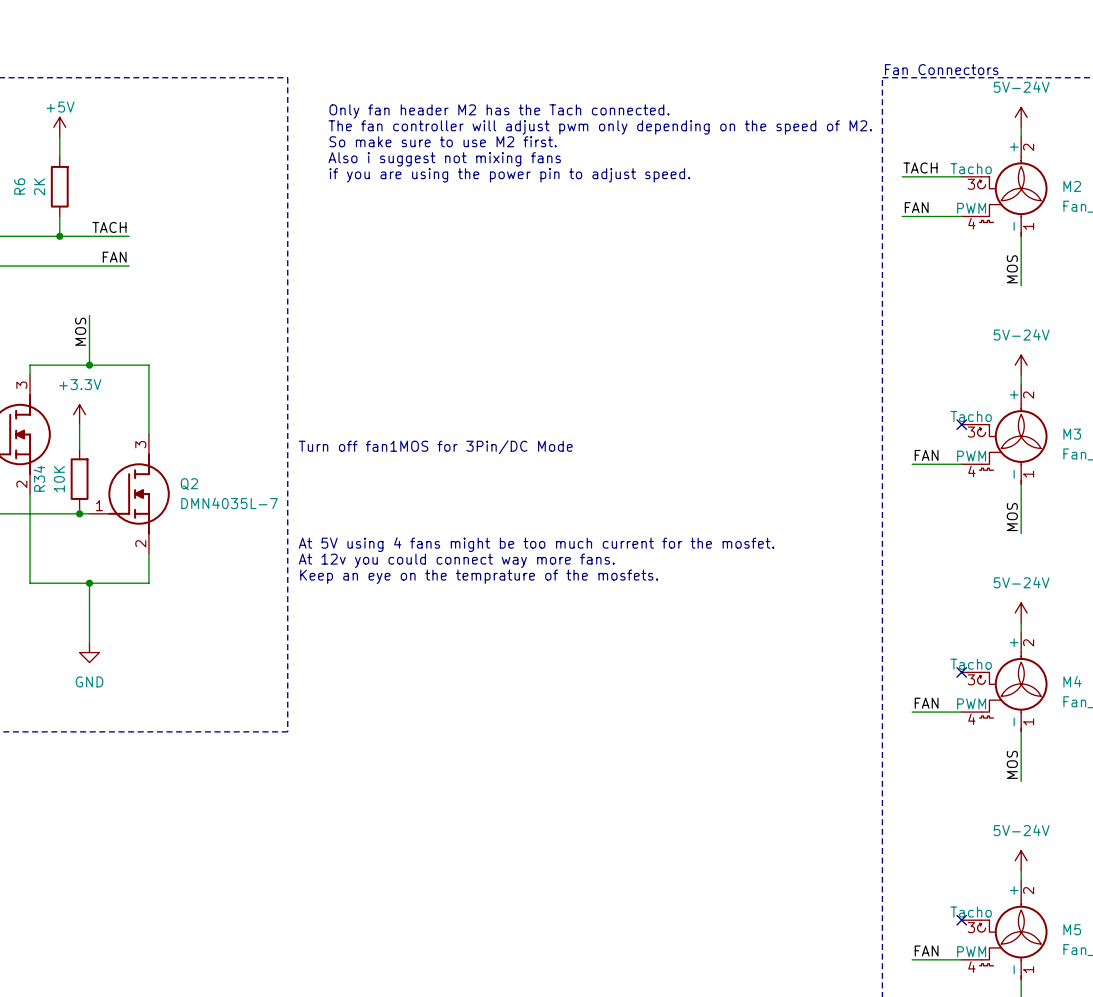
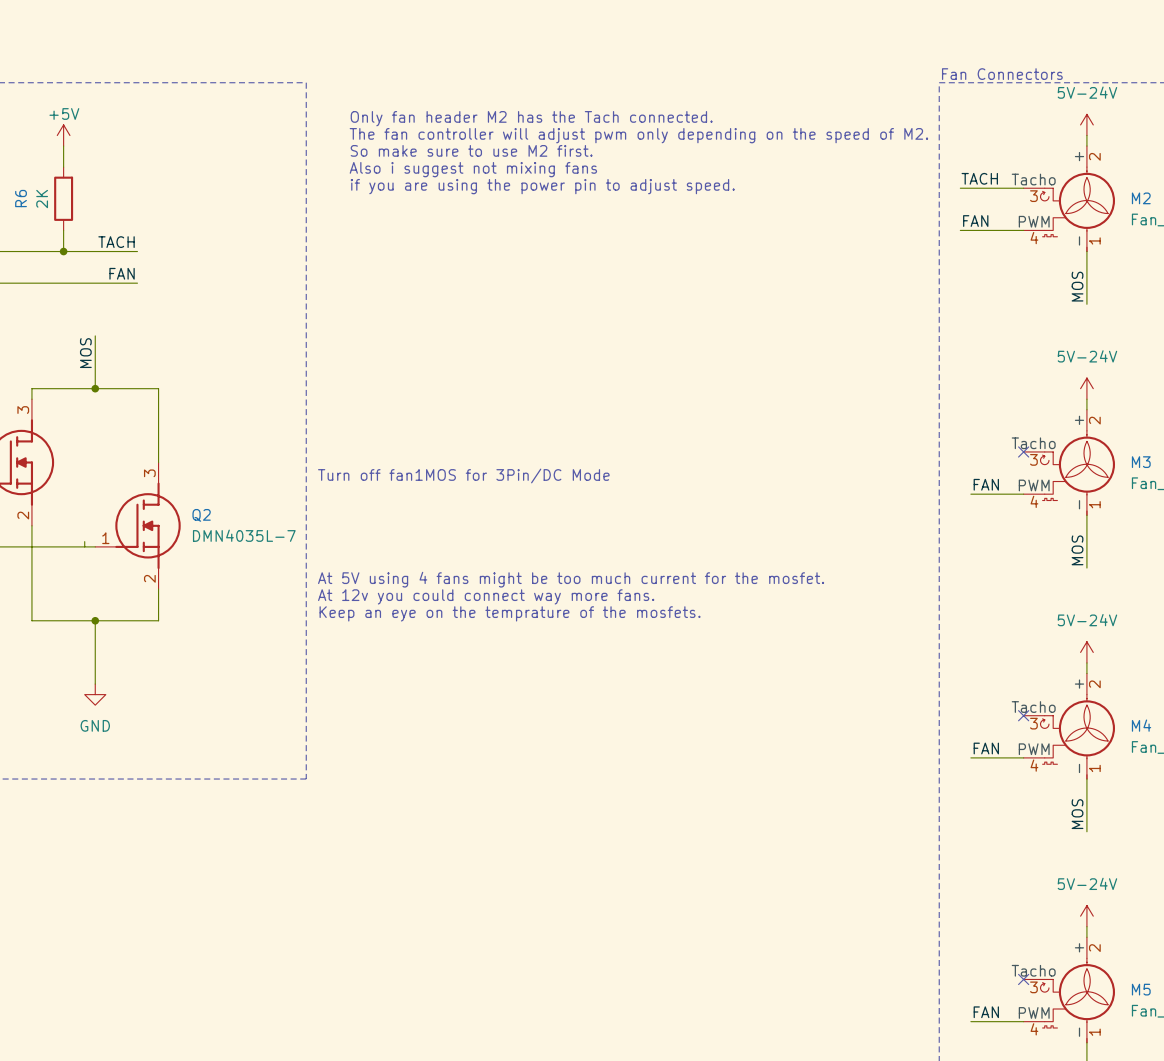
power symbol: +3.3V (79, 414) -> none
wire: (79, 424) (79, 449) -> none
R34: 10K (79, 479) -> none
junction: (79, 513) -> none

